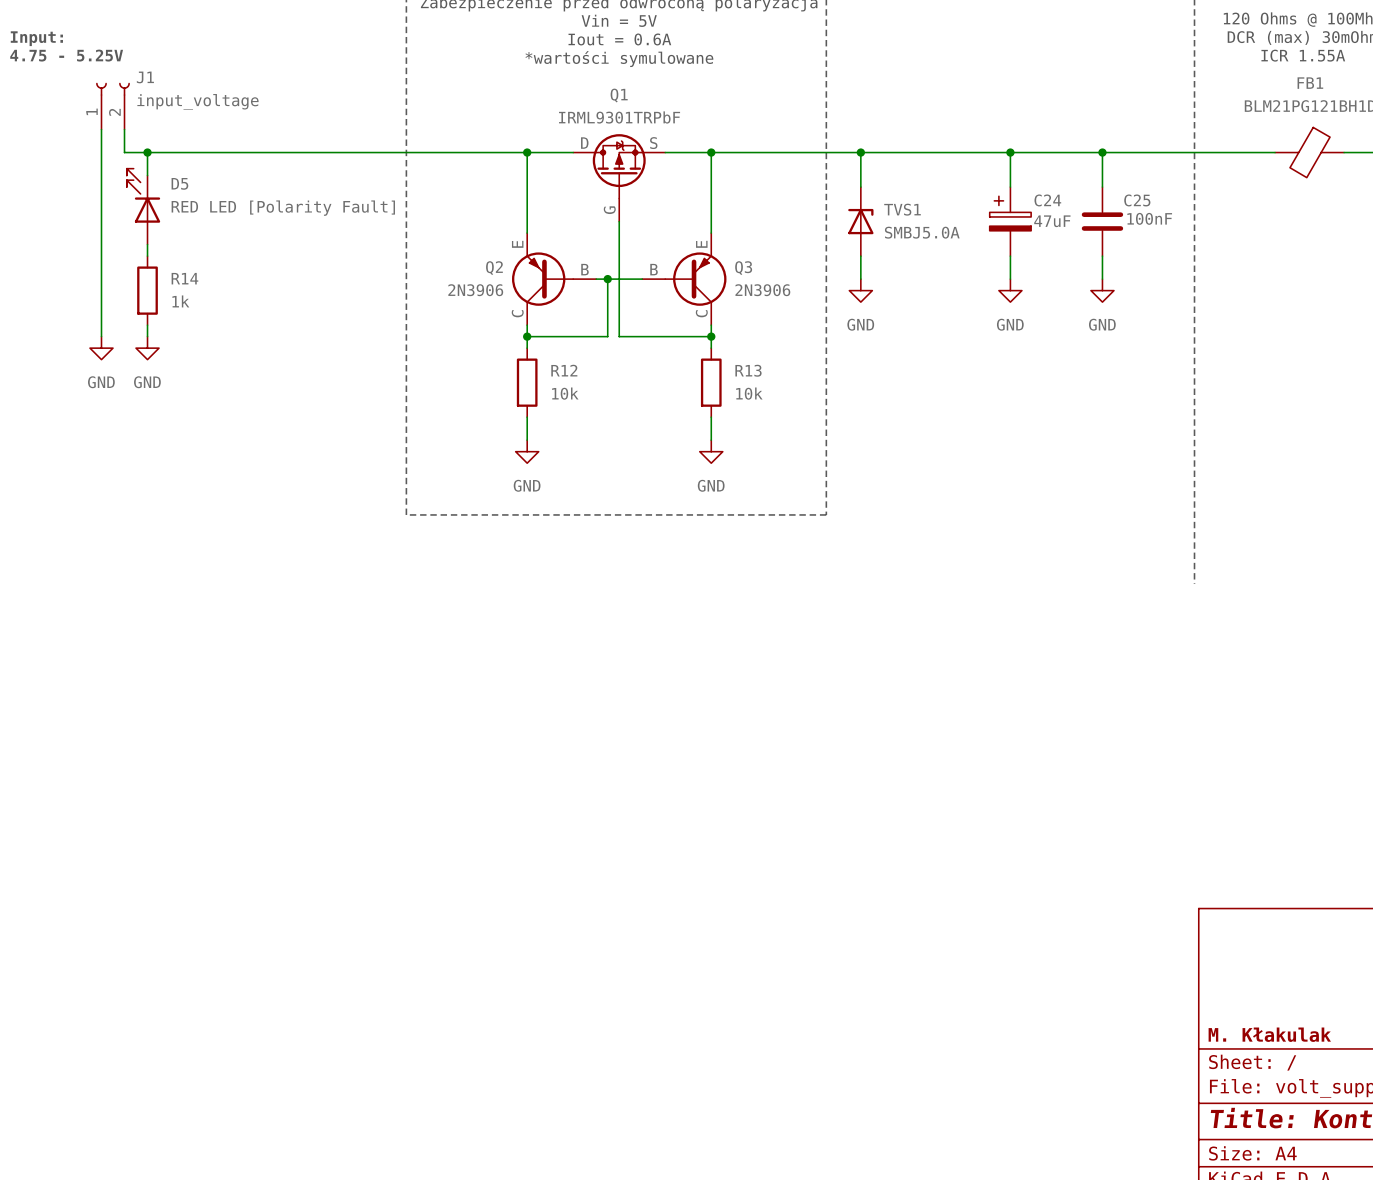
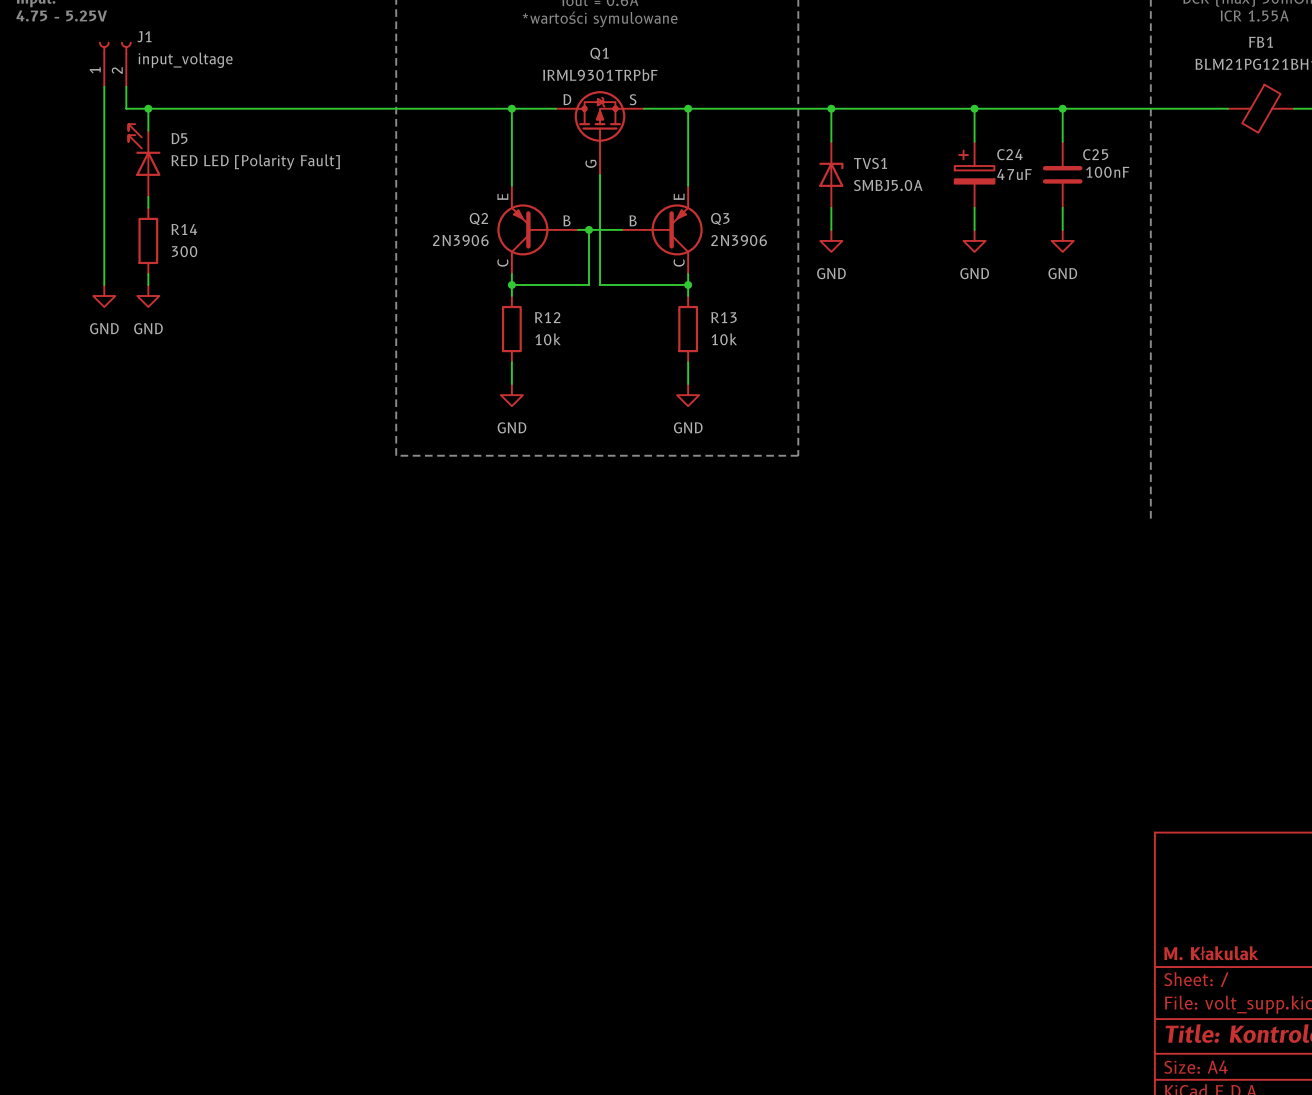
R14 value: 1k (180, 301) -> 300 (184, 251)

